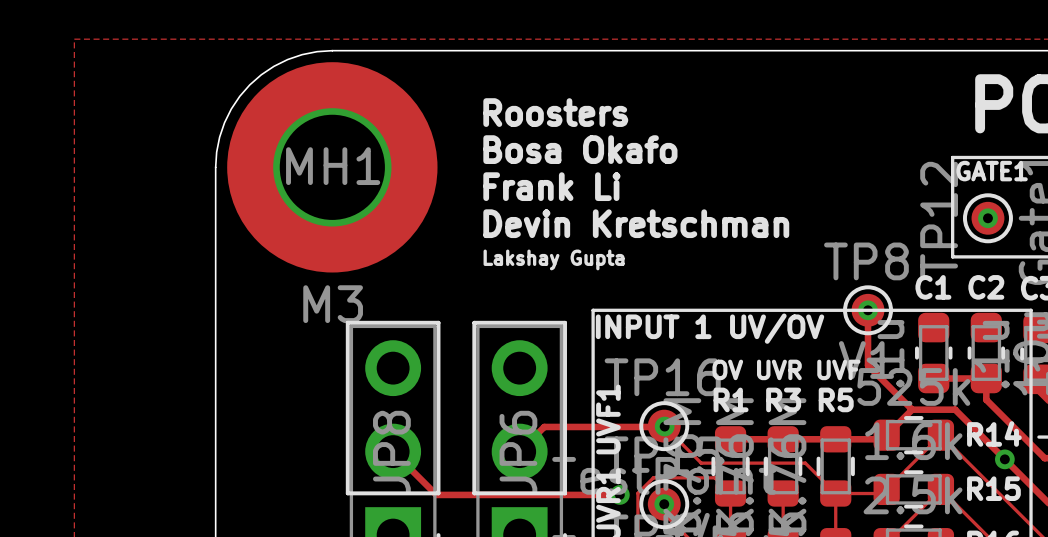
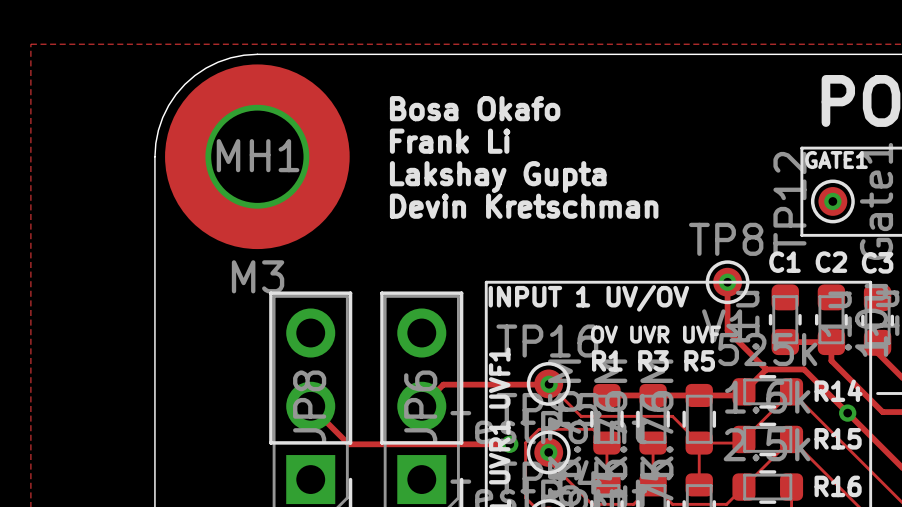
text: Roosters (555, 112) -> Bosa Okafo (475, 108)
text: Bosa Okafo (580, 149) -> Frank Li (450, 141)
text: Frank Li (551, 186) -> Lakshay Gupta (498, 177)
text: Lakshay Gupta (554, 259) -> none

